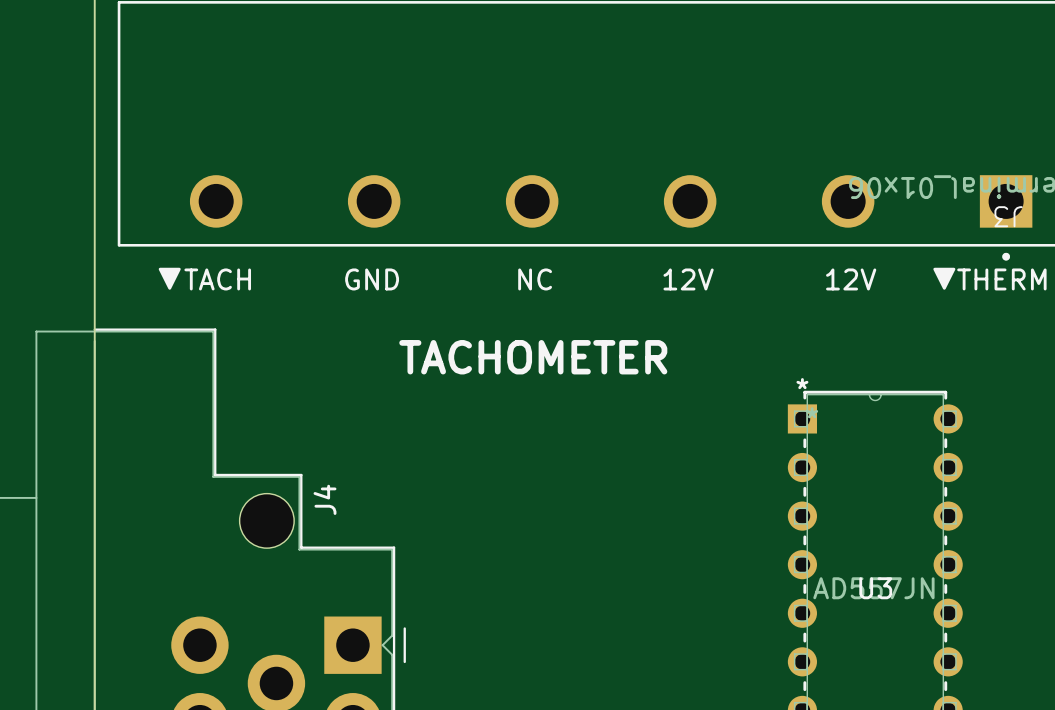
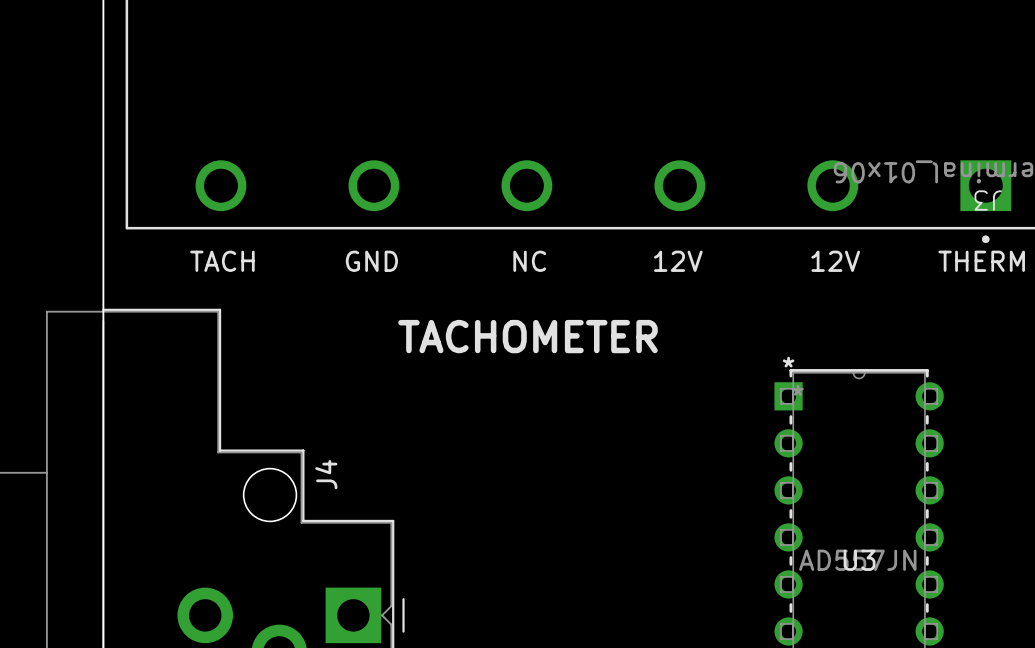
drawing: [158, 267, 181, 290] -> none
drawing: [933, 267, 956, 290] -> none

